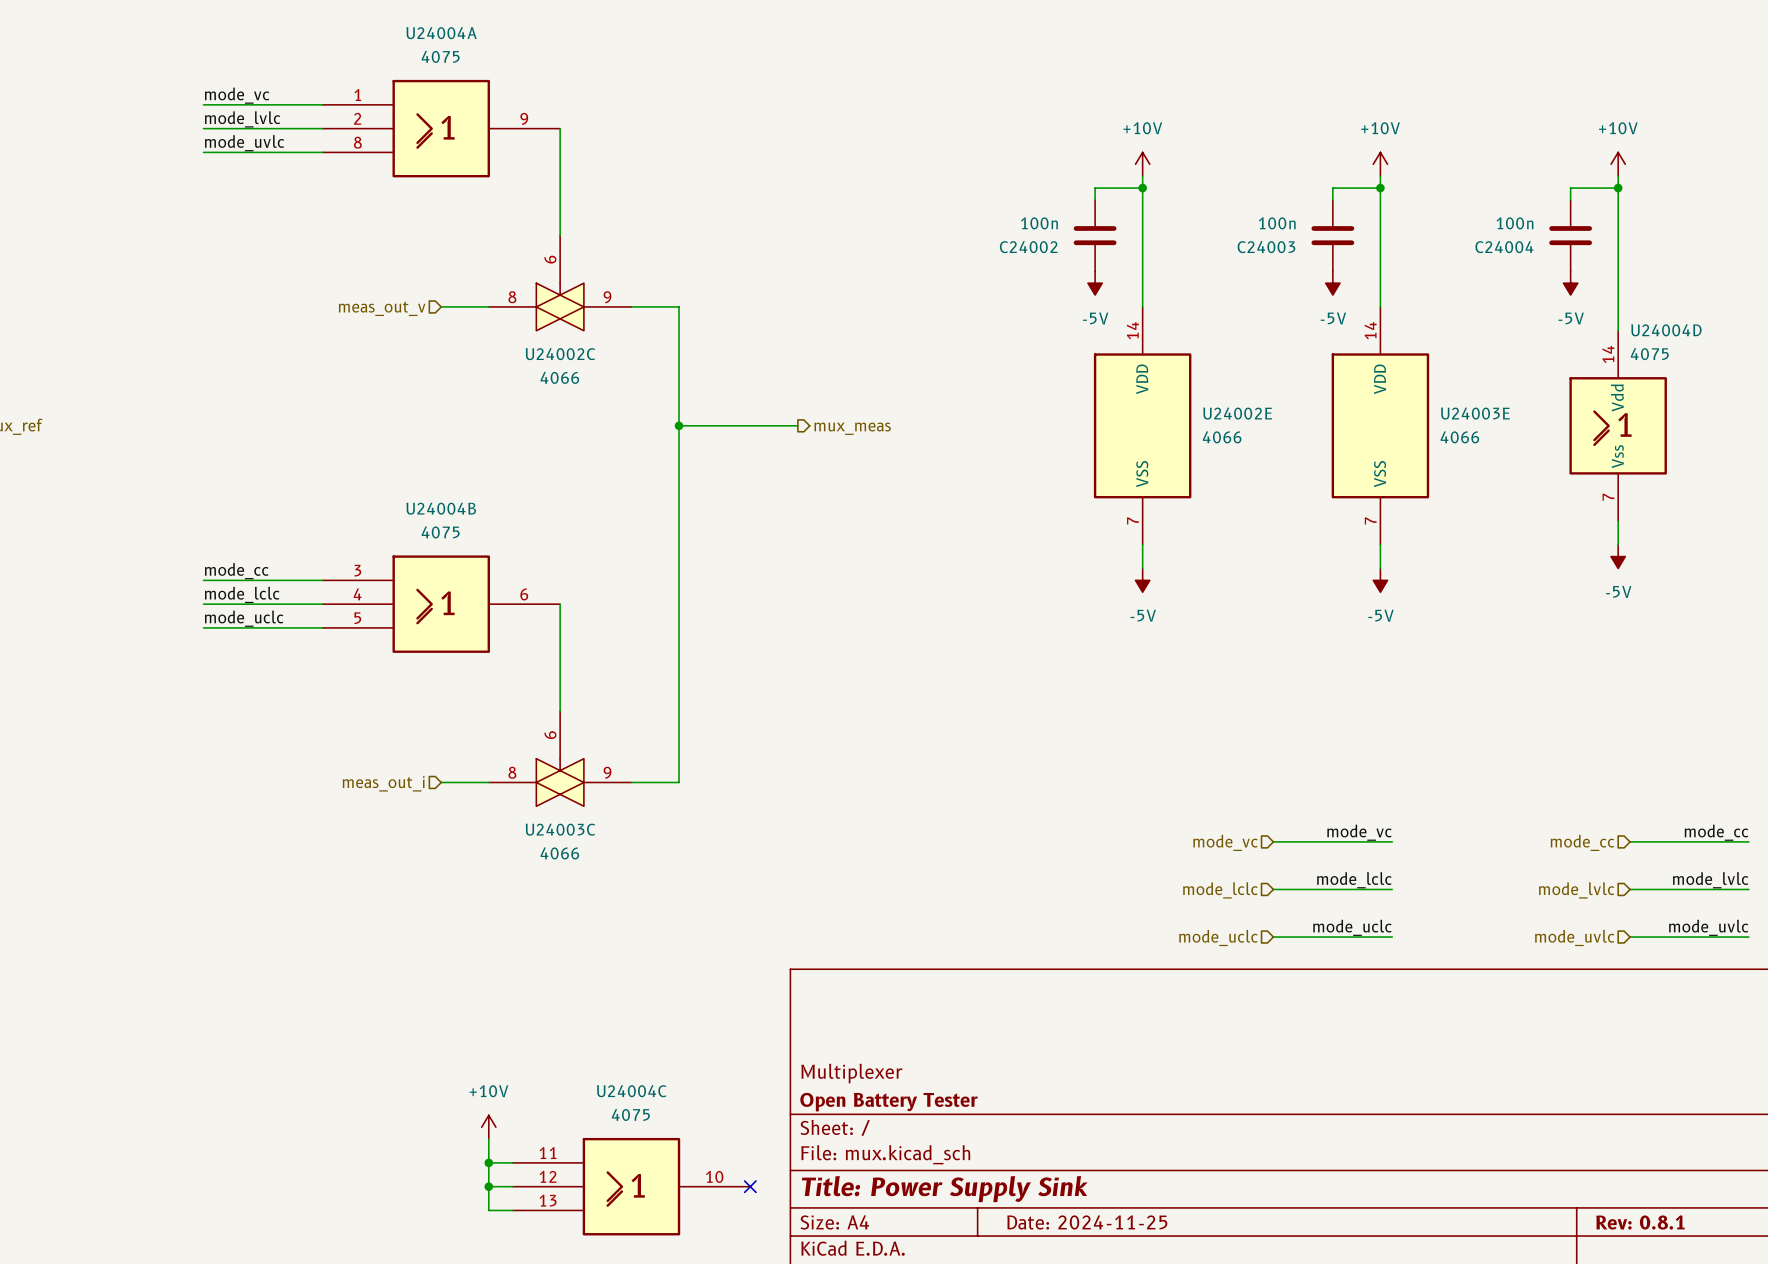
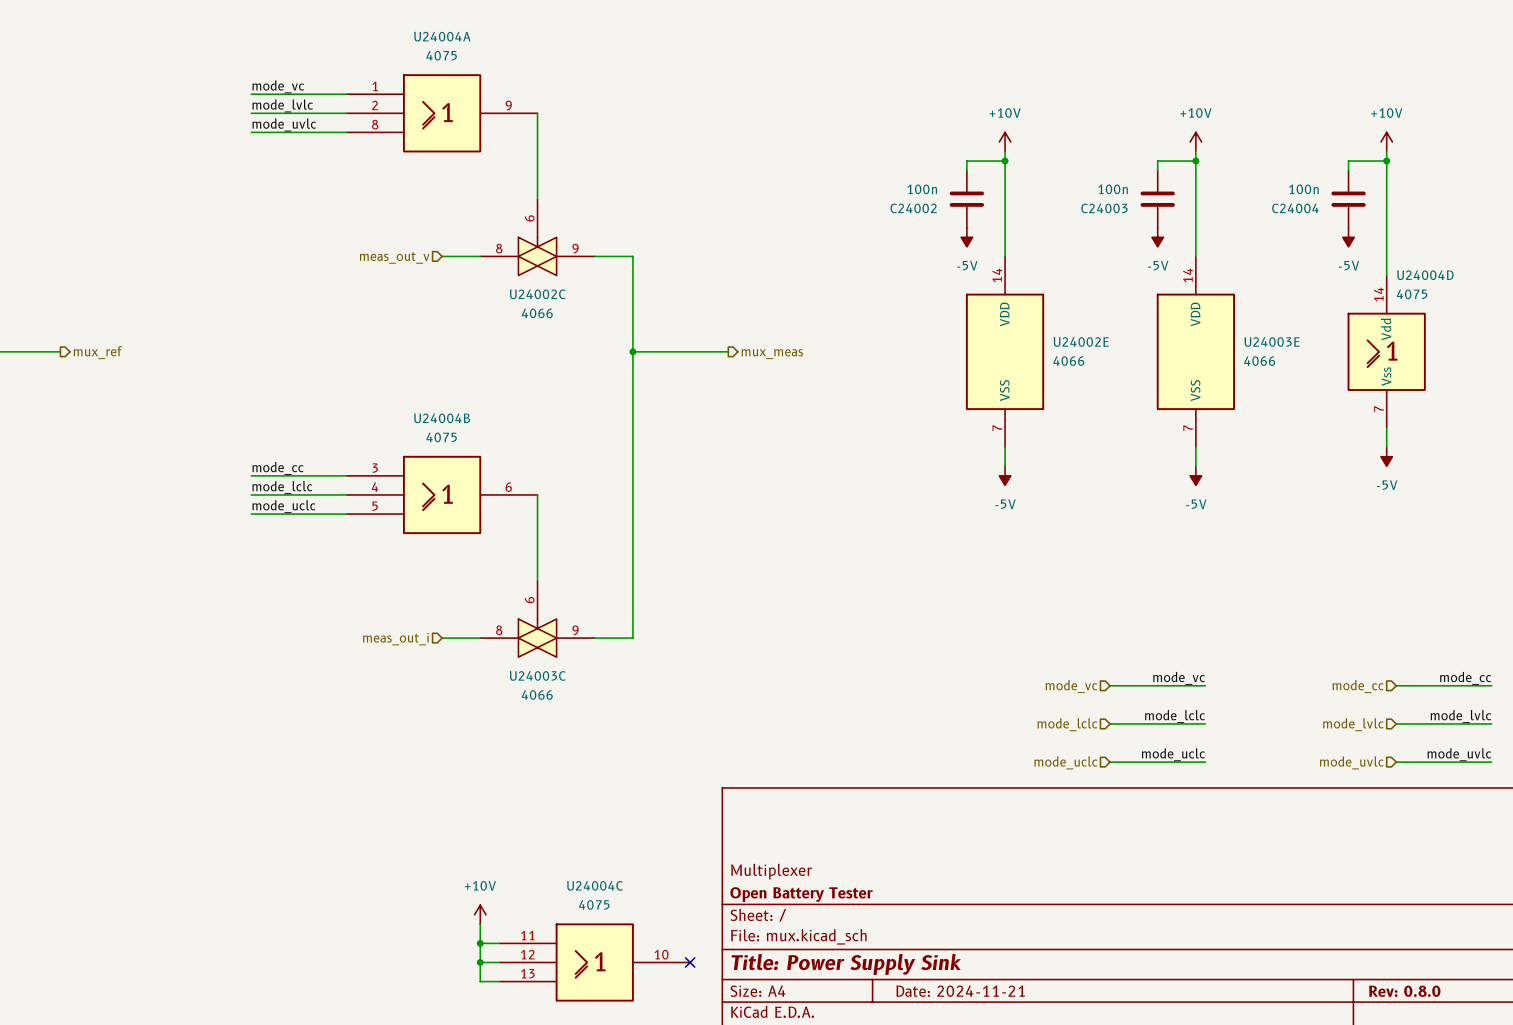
title block: Date: 2024-11-25 (1087, 1222) -> Date: 2024-11-21 (960, 991)
title block: Rev: 0.8.1 (1640, 1222) -> Rev: 0.8.0 (1404, 991)

